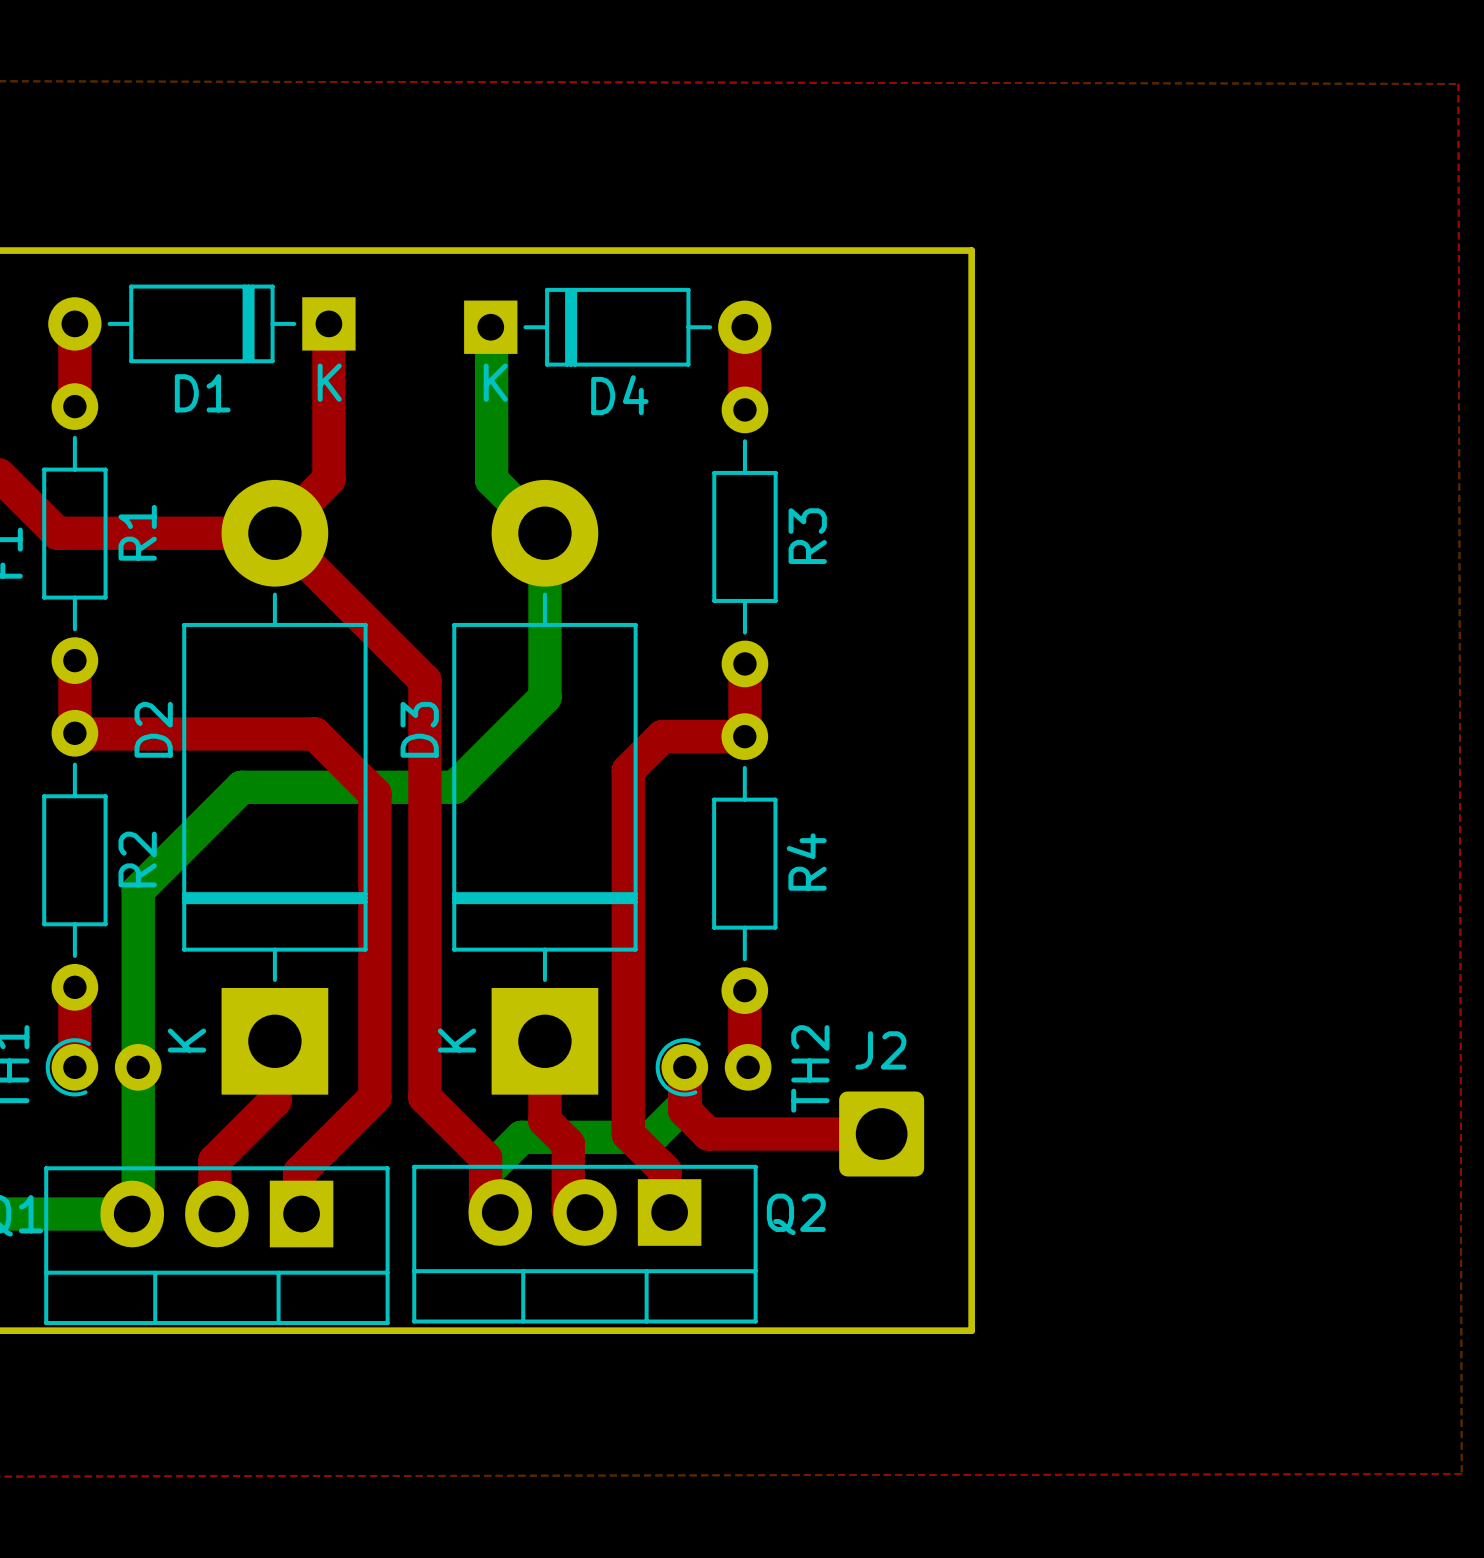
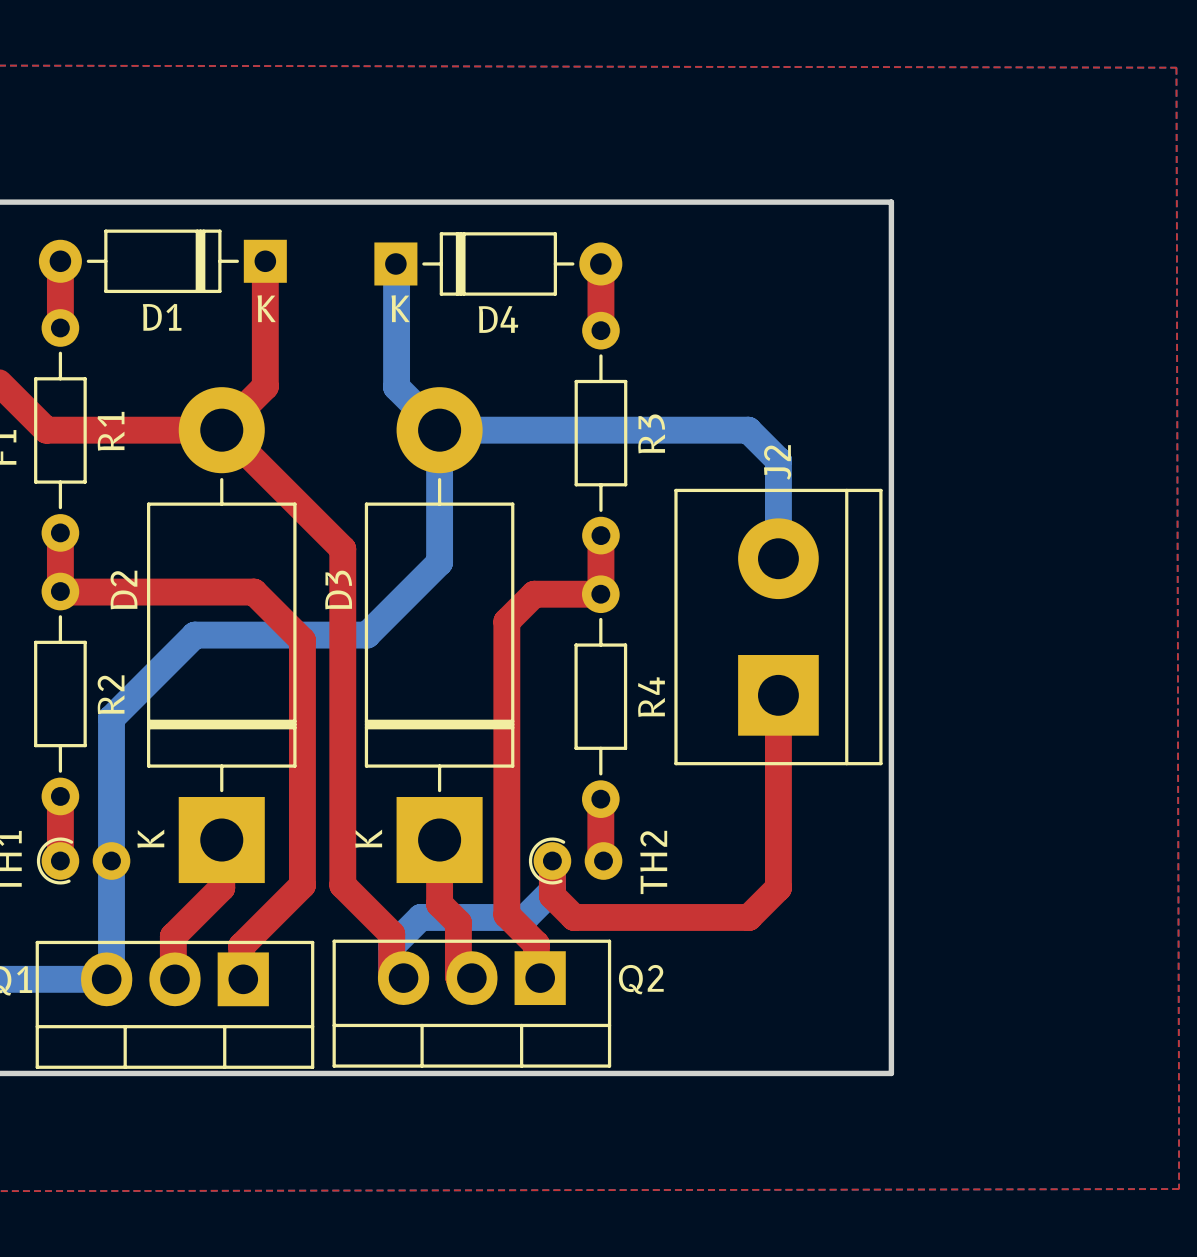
board edge: (971, 250) (971, 1330) -> (783, 202) (891, 202) (891, 1073) (783, 1073)
bottom track: none -> (439, 430) (748, 430) (778, 460) (778, 558)
J2 name position: J2 (880, 1050) -> J2 (777, 462)
J2 footprint: [839, 1091, 925, 1177] -> [674, 488, 883, 766]
top track: (708, 1133) (894, 1133) -> (571, 914) (574, 917) (748, 917) (778, 887) (778, 695)

